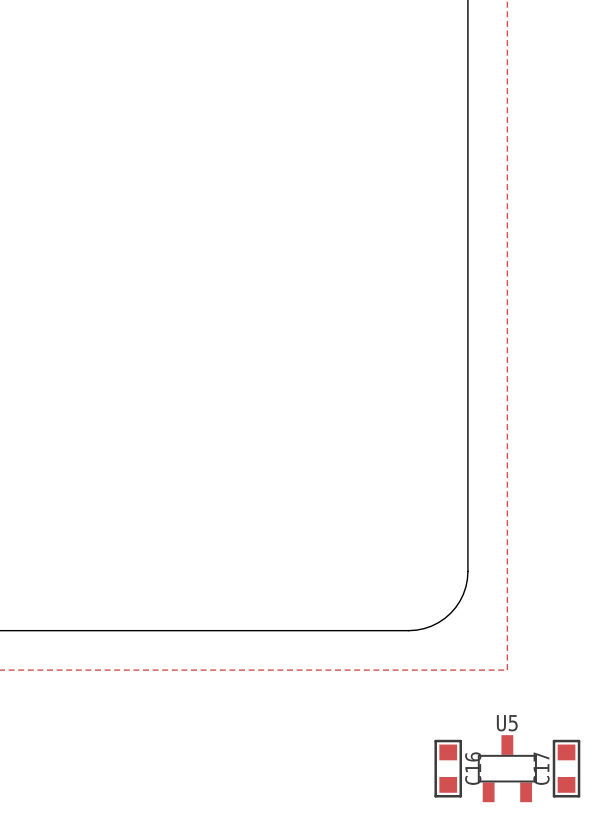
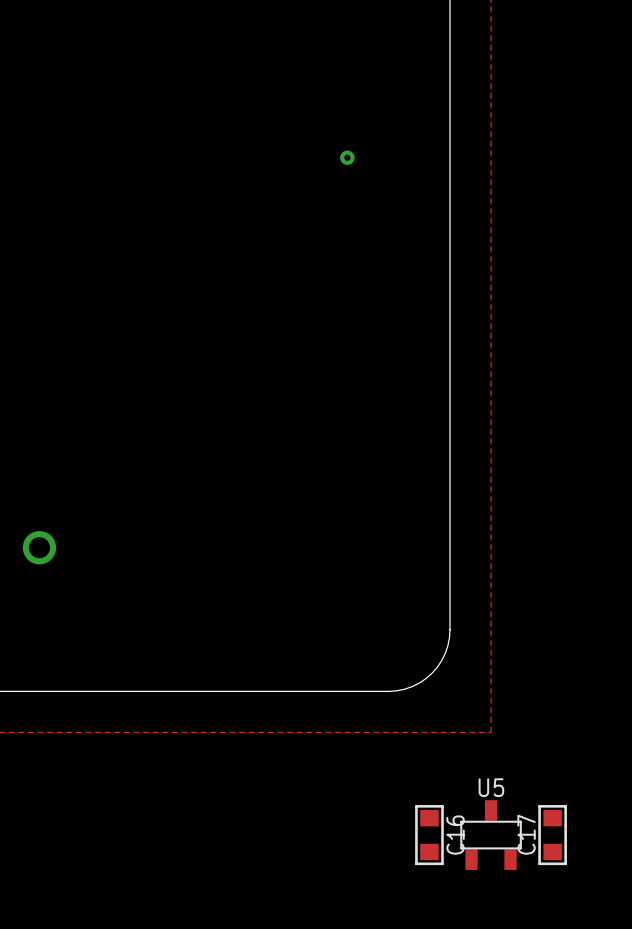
via: none -> (347, 157)
part: none -> (39, 547)

